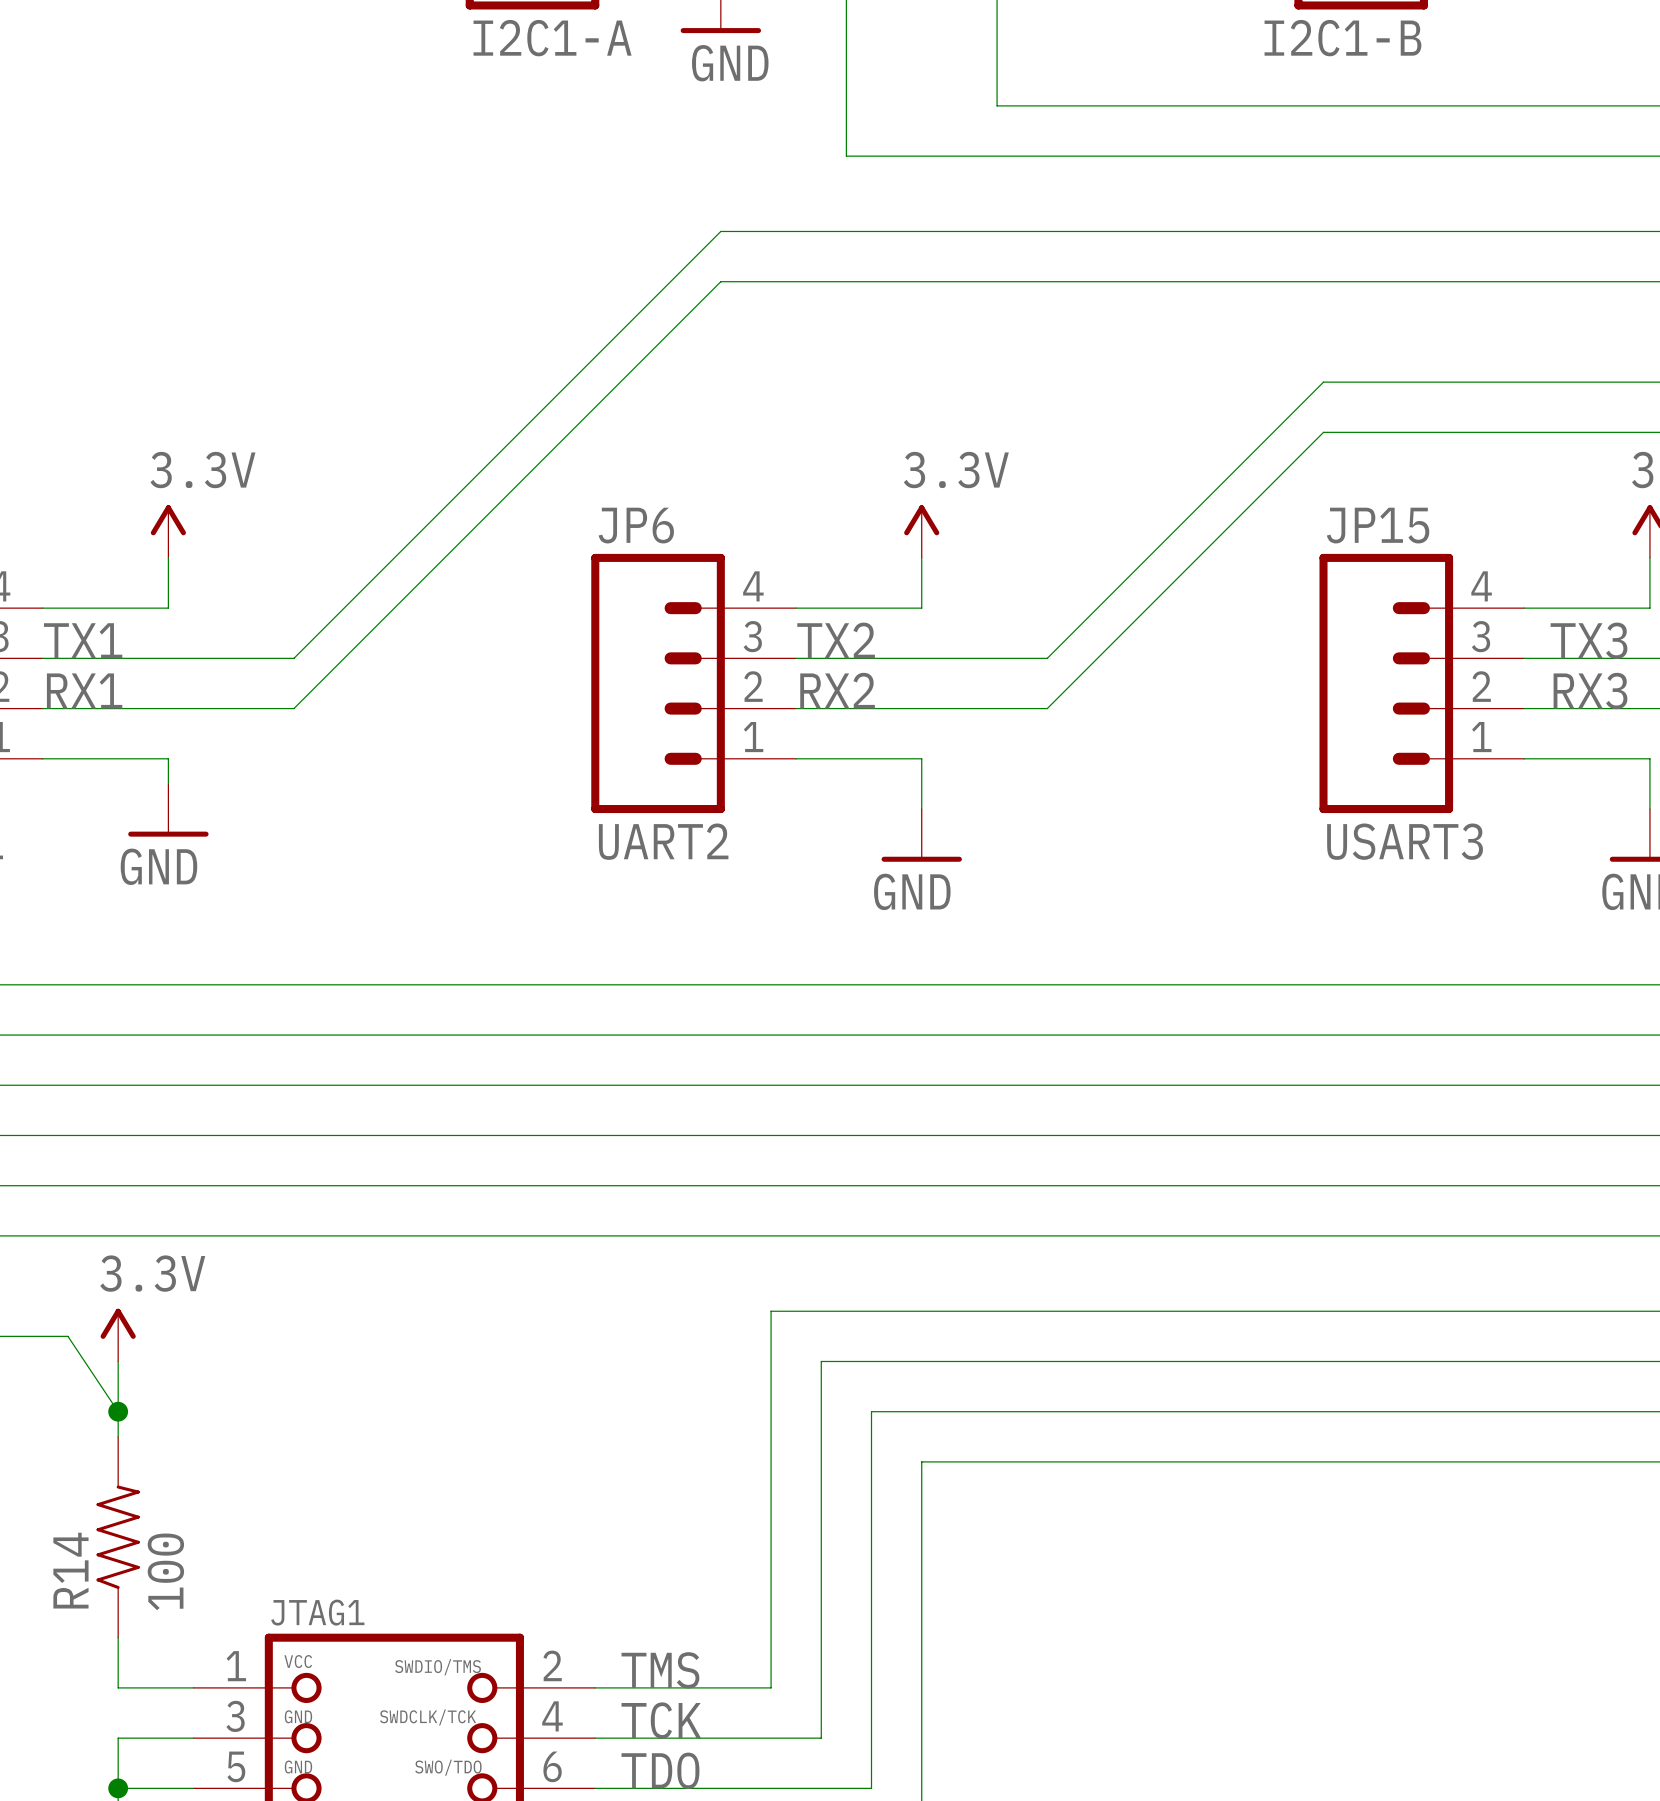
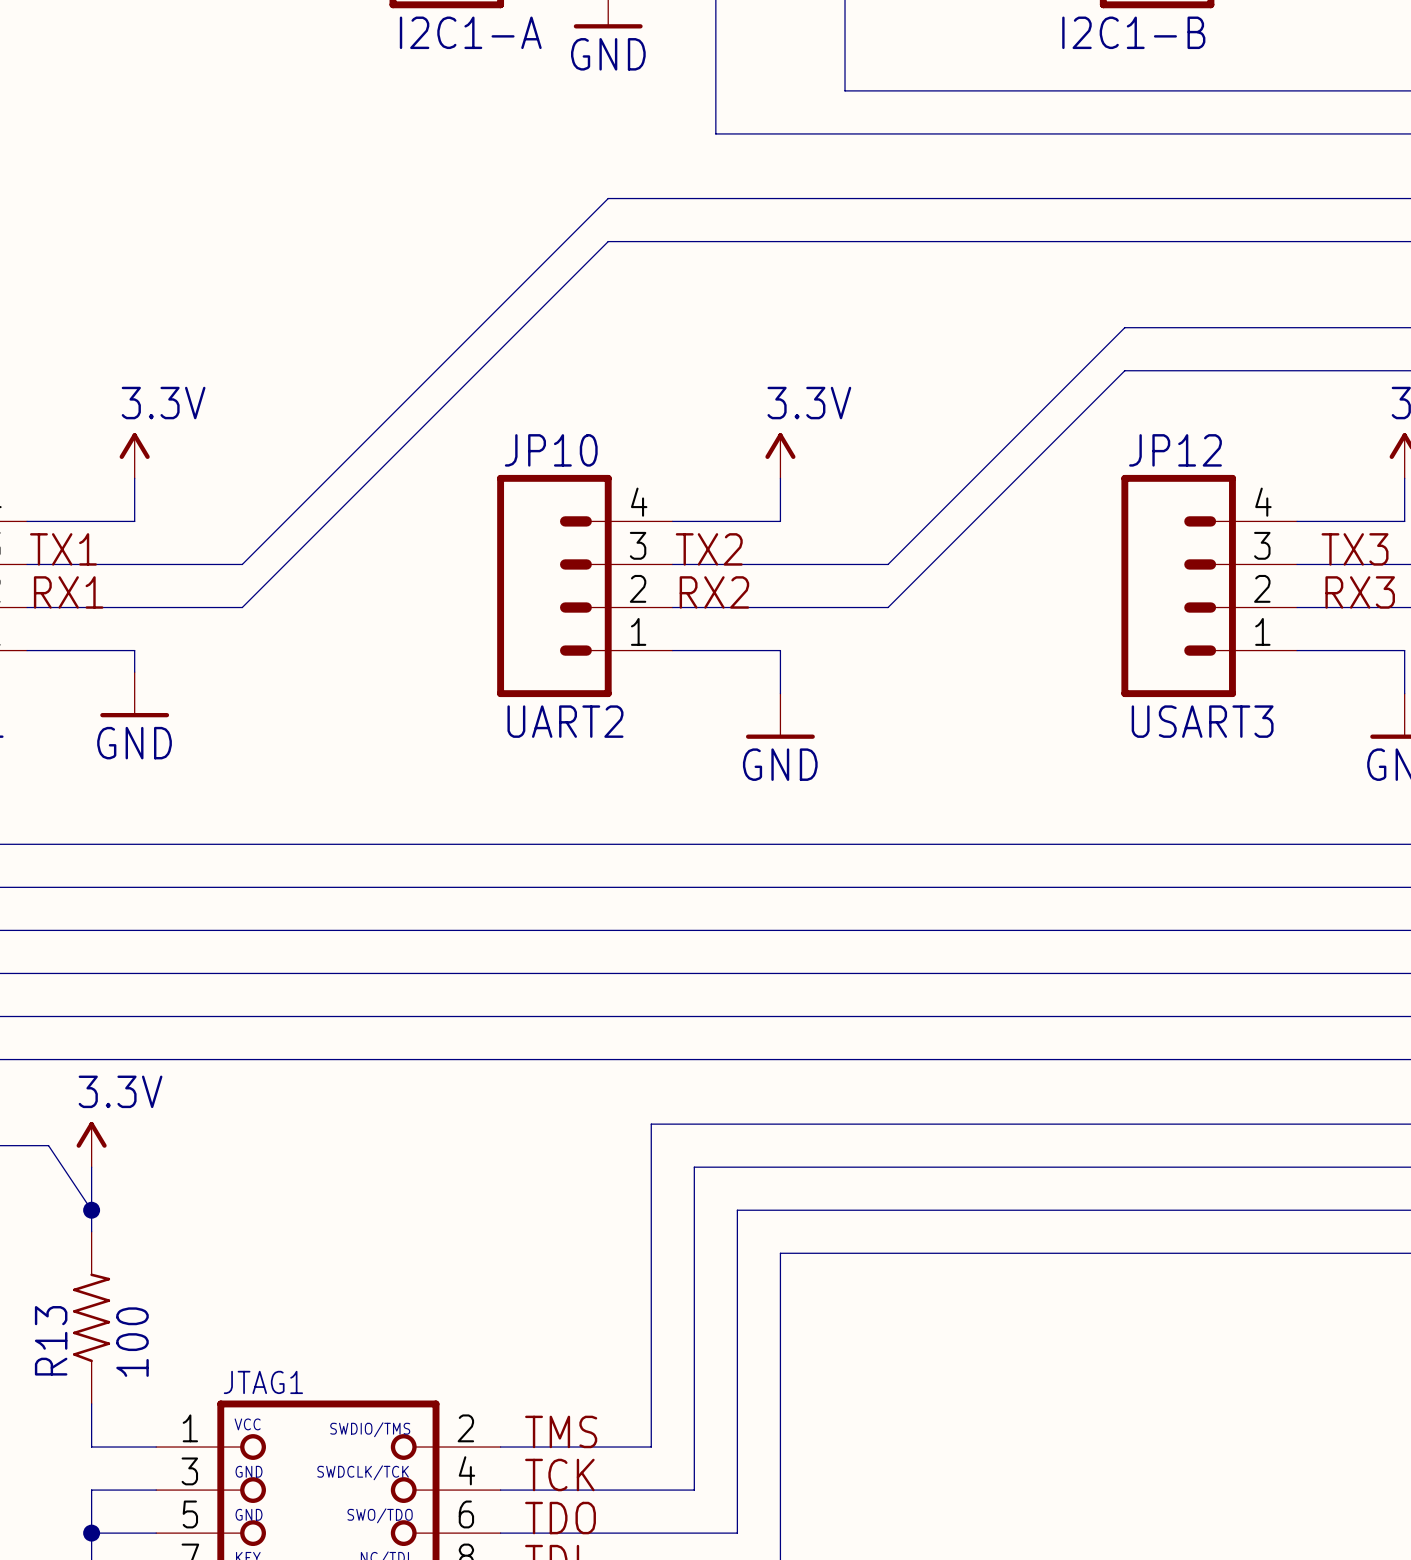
JP6 name: JP6 (636, 525) -> JP10 (551, 450)
JP15 name: JP15 (1378, 525) -> JP12 (1175, 450)
R14 name: R14 (70, 1570) -> R13 (51, 1340)

